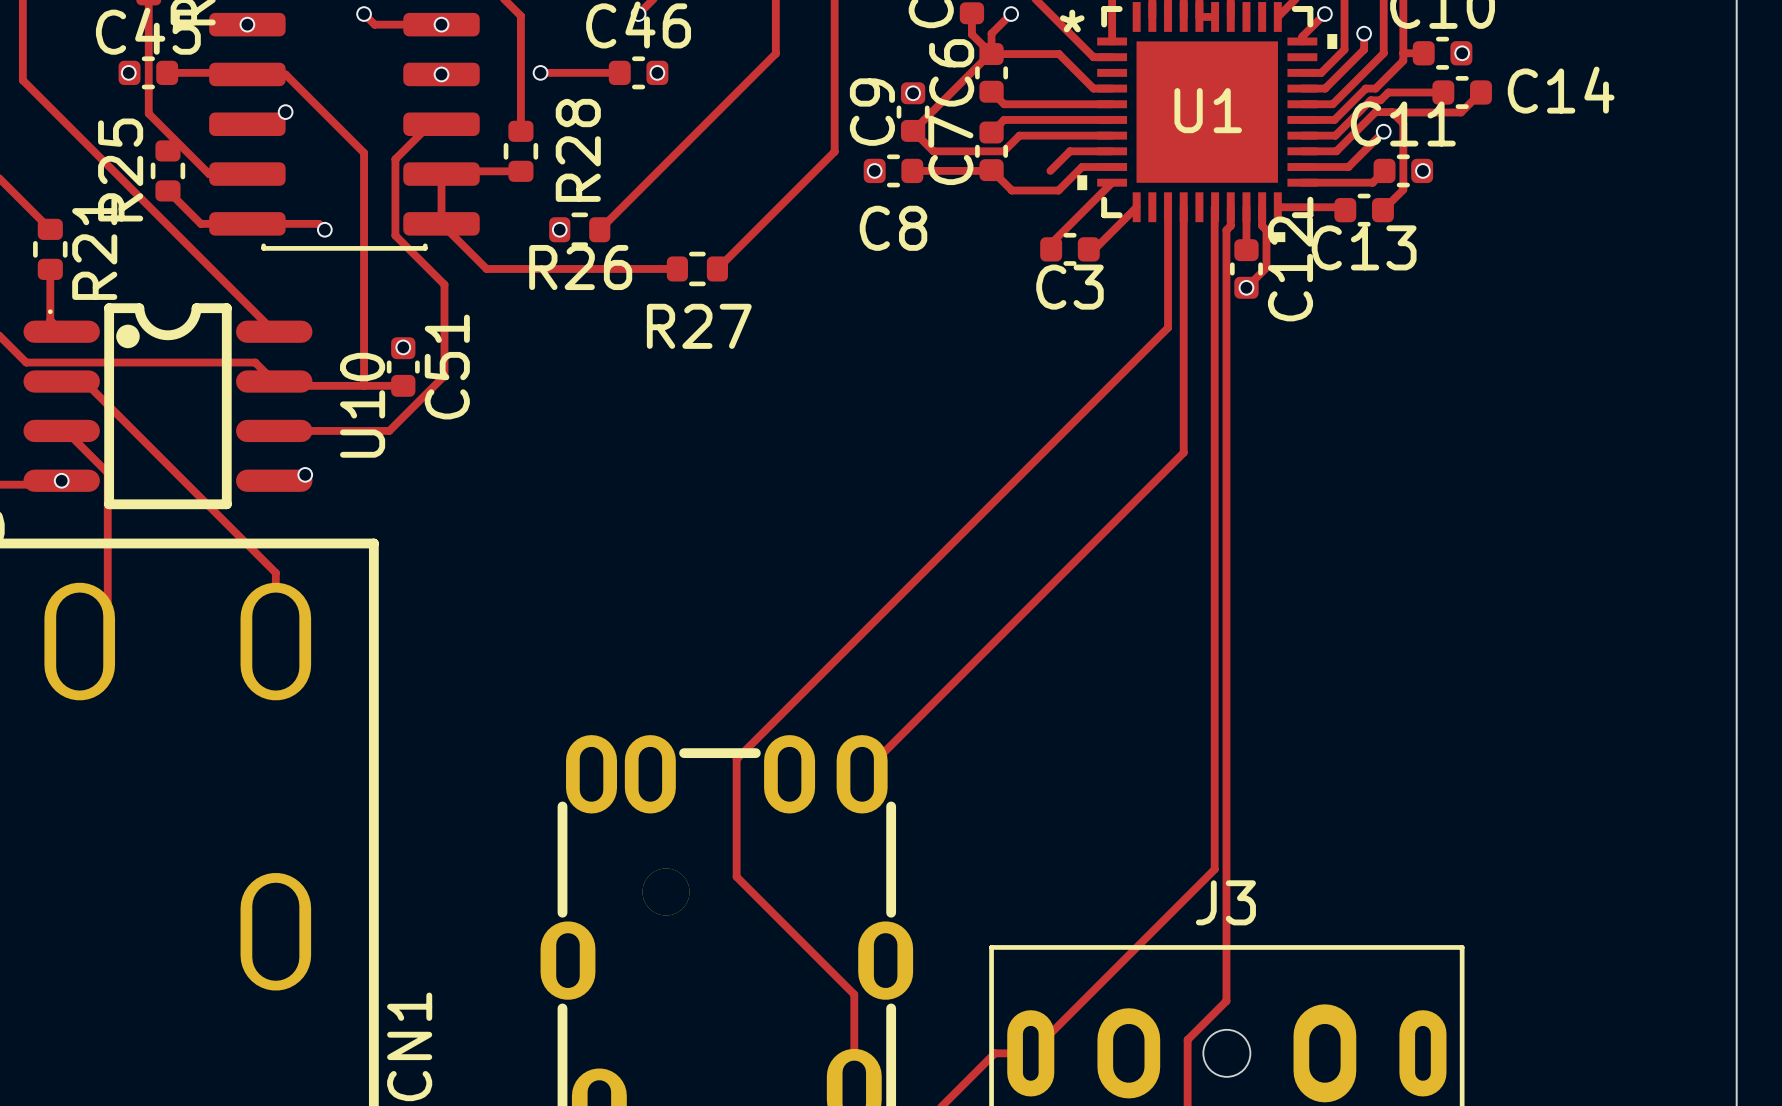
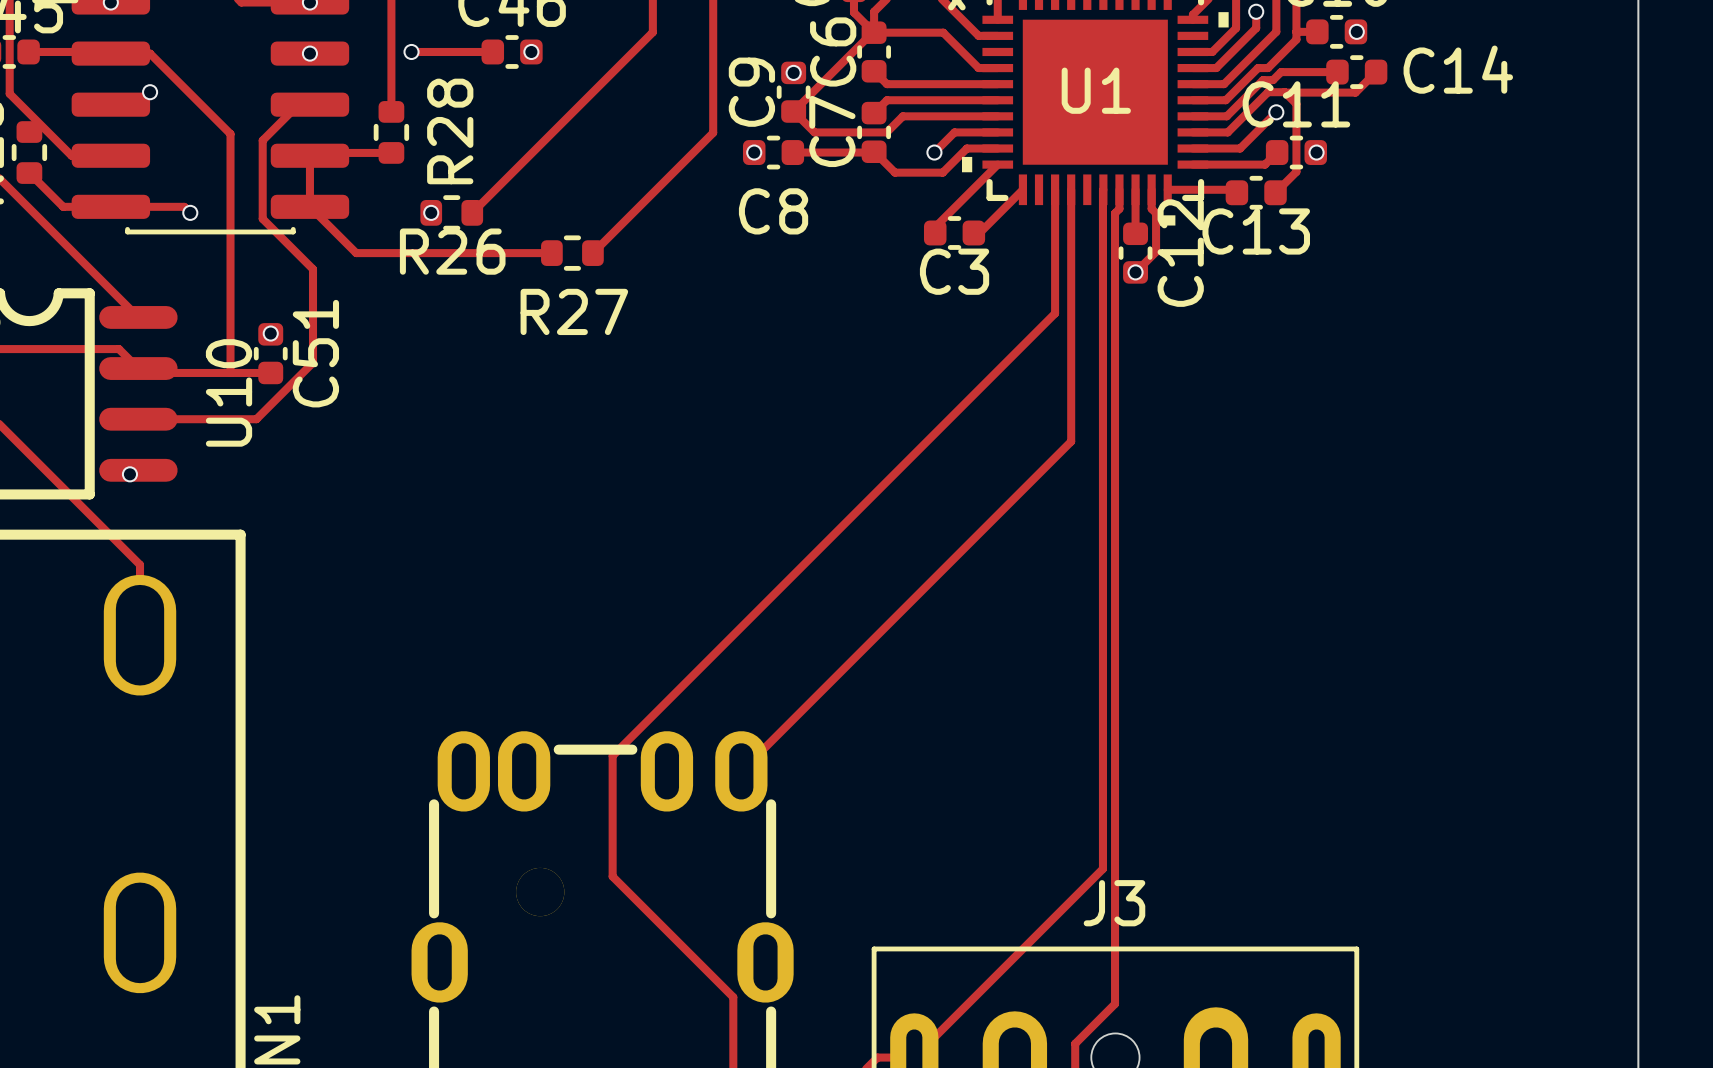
via: none -> (934, 152)
via position: (305, 474) -> (129, 474)

